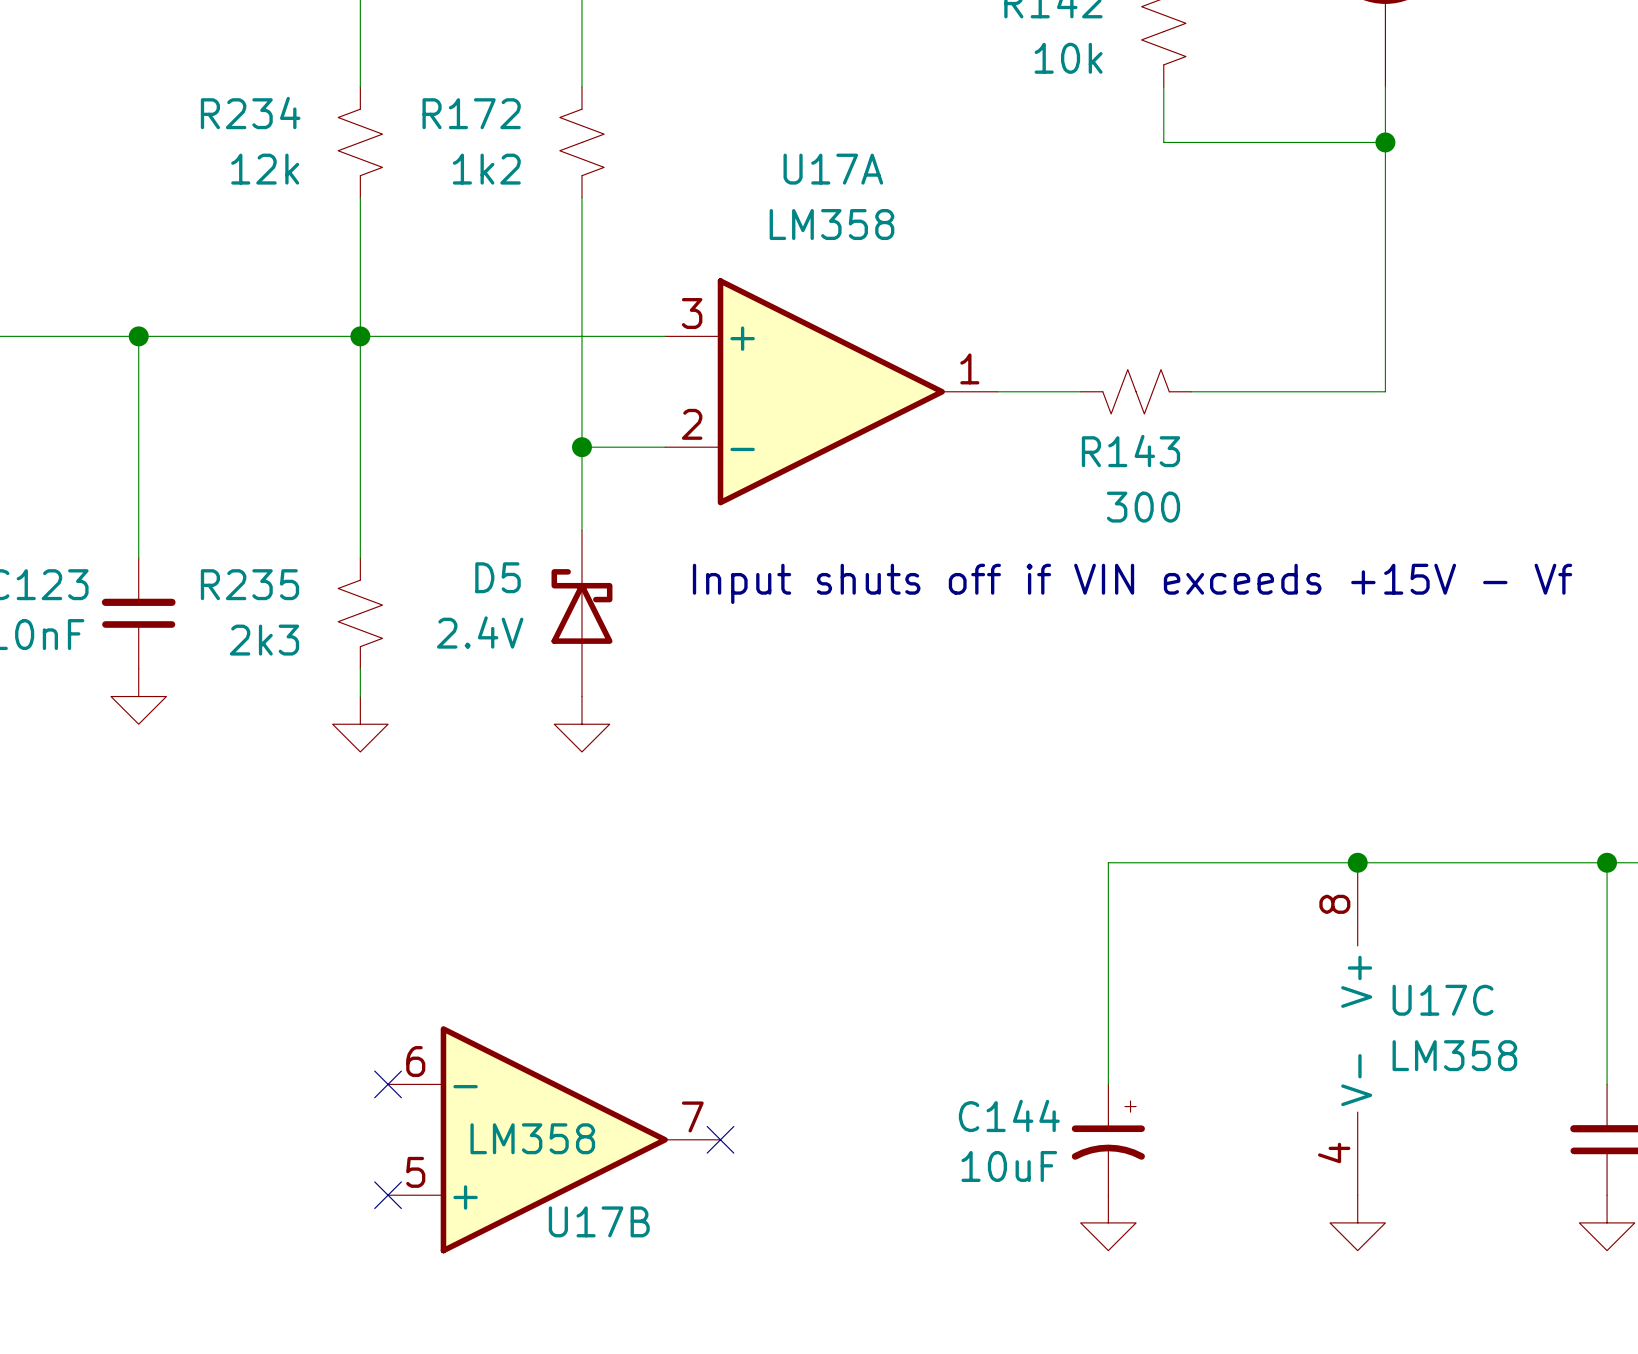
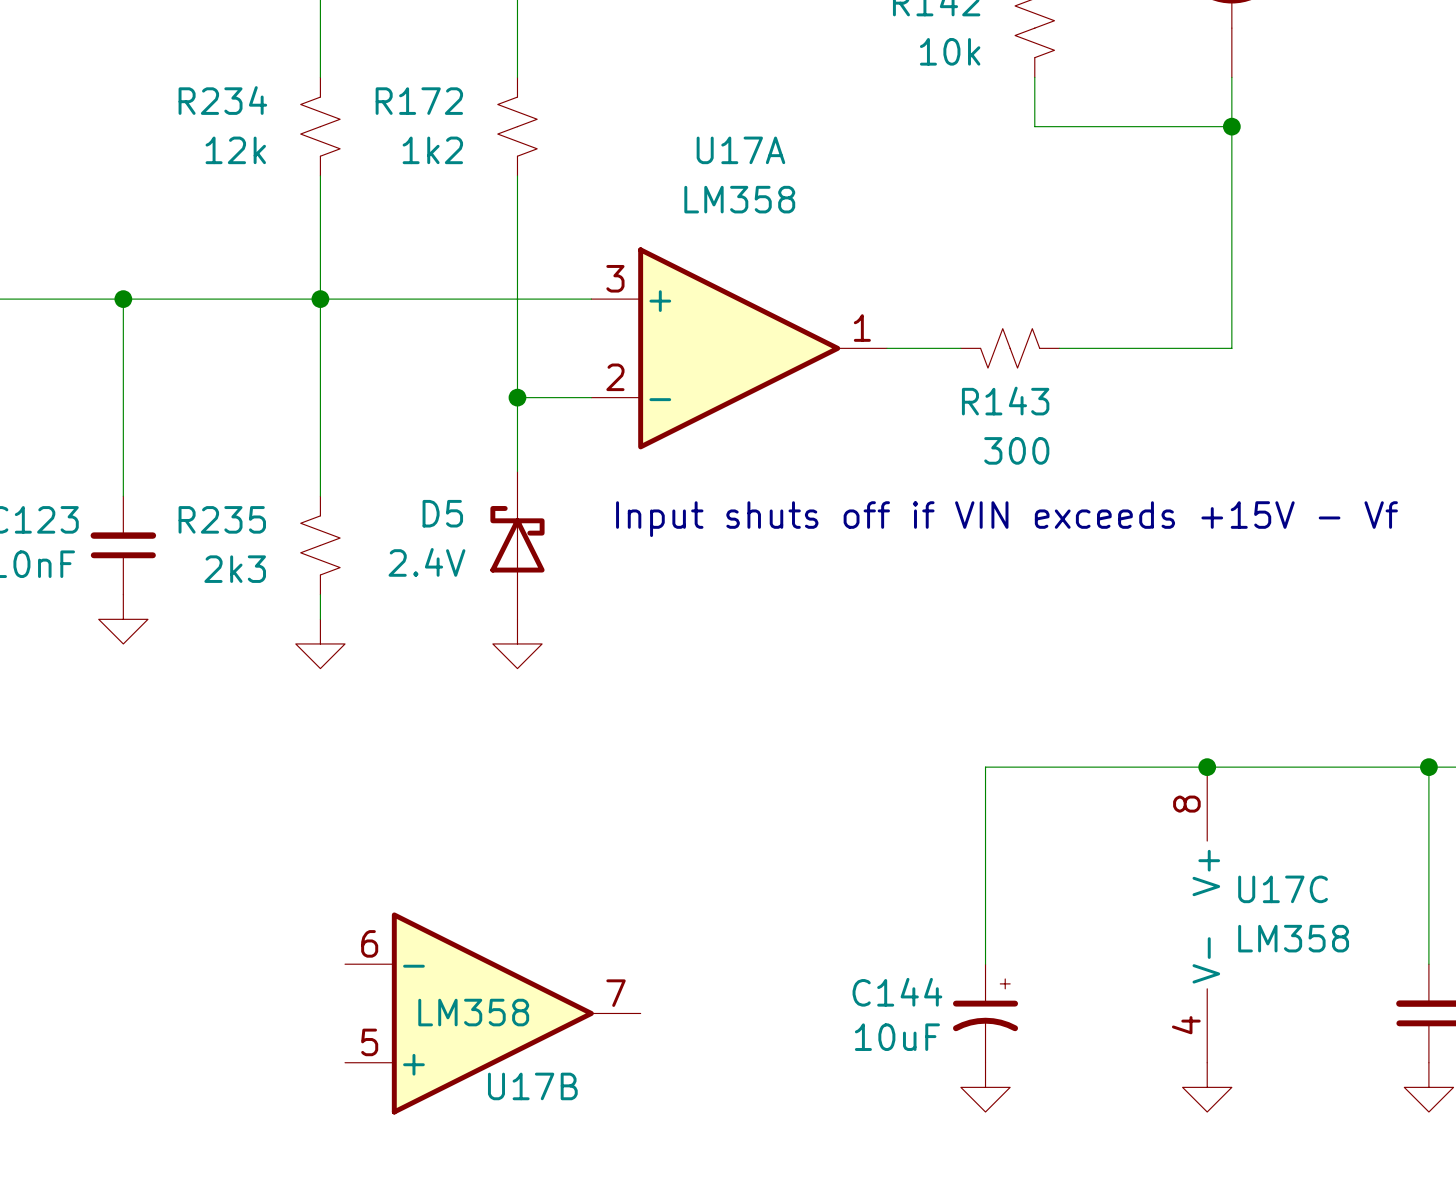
no-connect mark: (388, 1084) -> none
no-connect mark: (720, 1139) -> none
no-connect mark: (388, 1195) -> none

